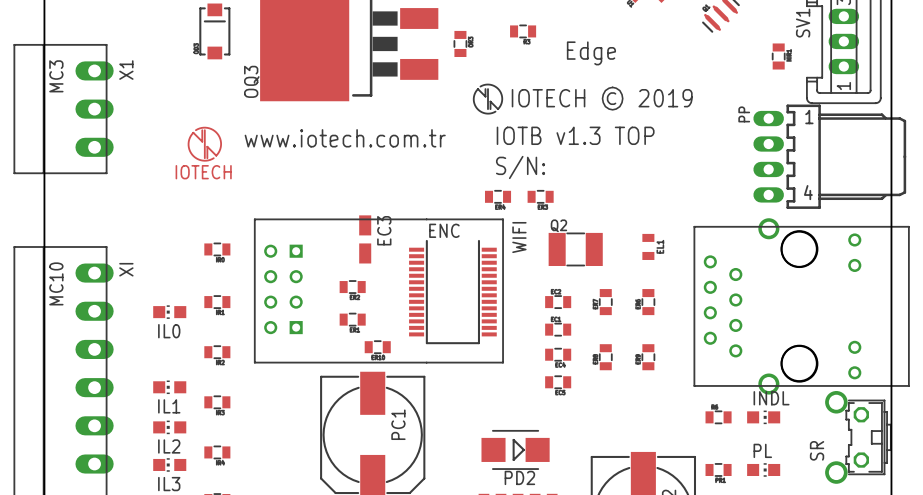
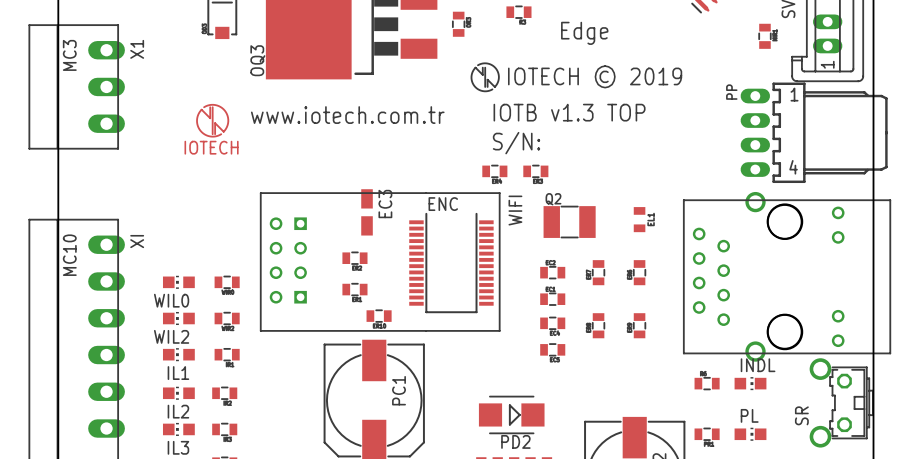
part: (217, 249) -> none
part position: (217, 302) -> (227, 354)
part: none -> (227, 282)
IL0 name: IL0 (169, 331) -> WIL0 (171, 300)
WIL2: none -> (178, 318)
part: none -> (227, 318)
part position: (217, 352) -> (224, 393)
part position: (217, 402) -> (224, 429)
part: (217, 452) -> none

